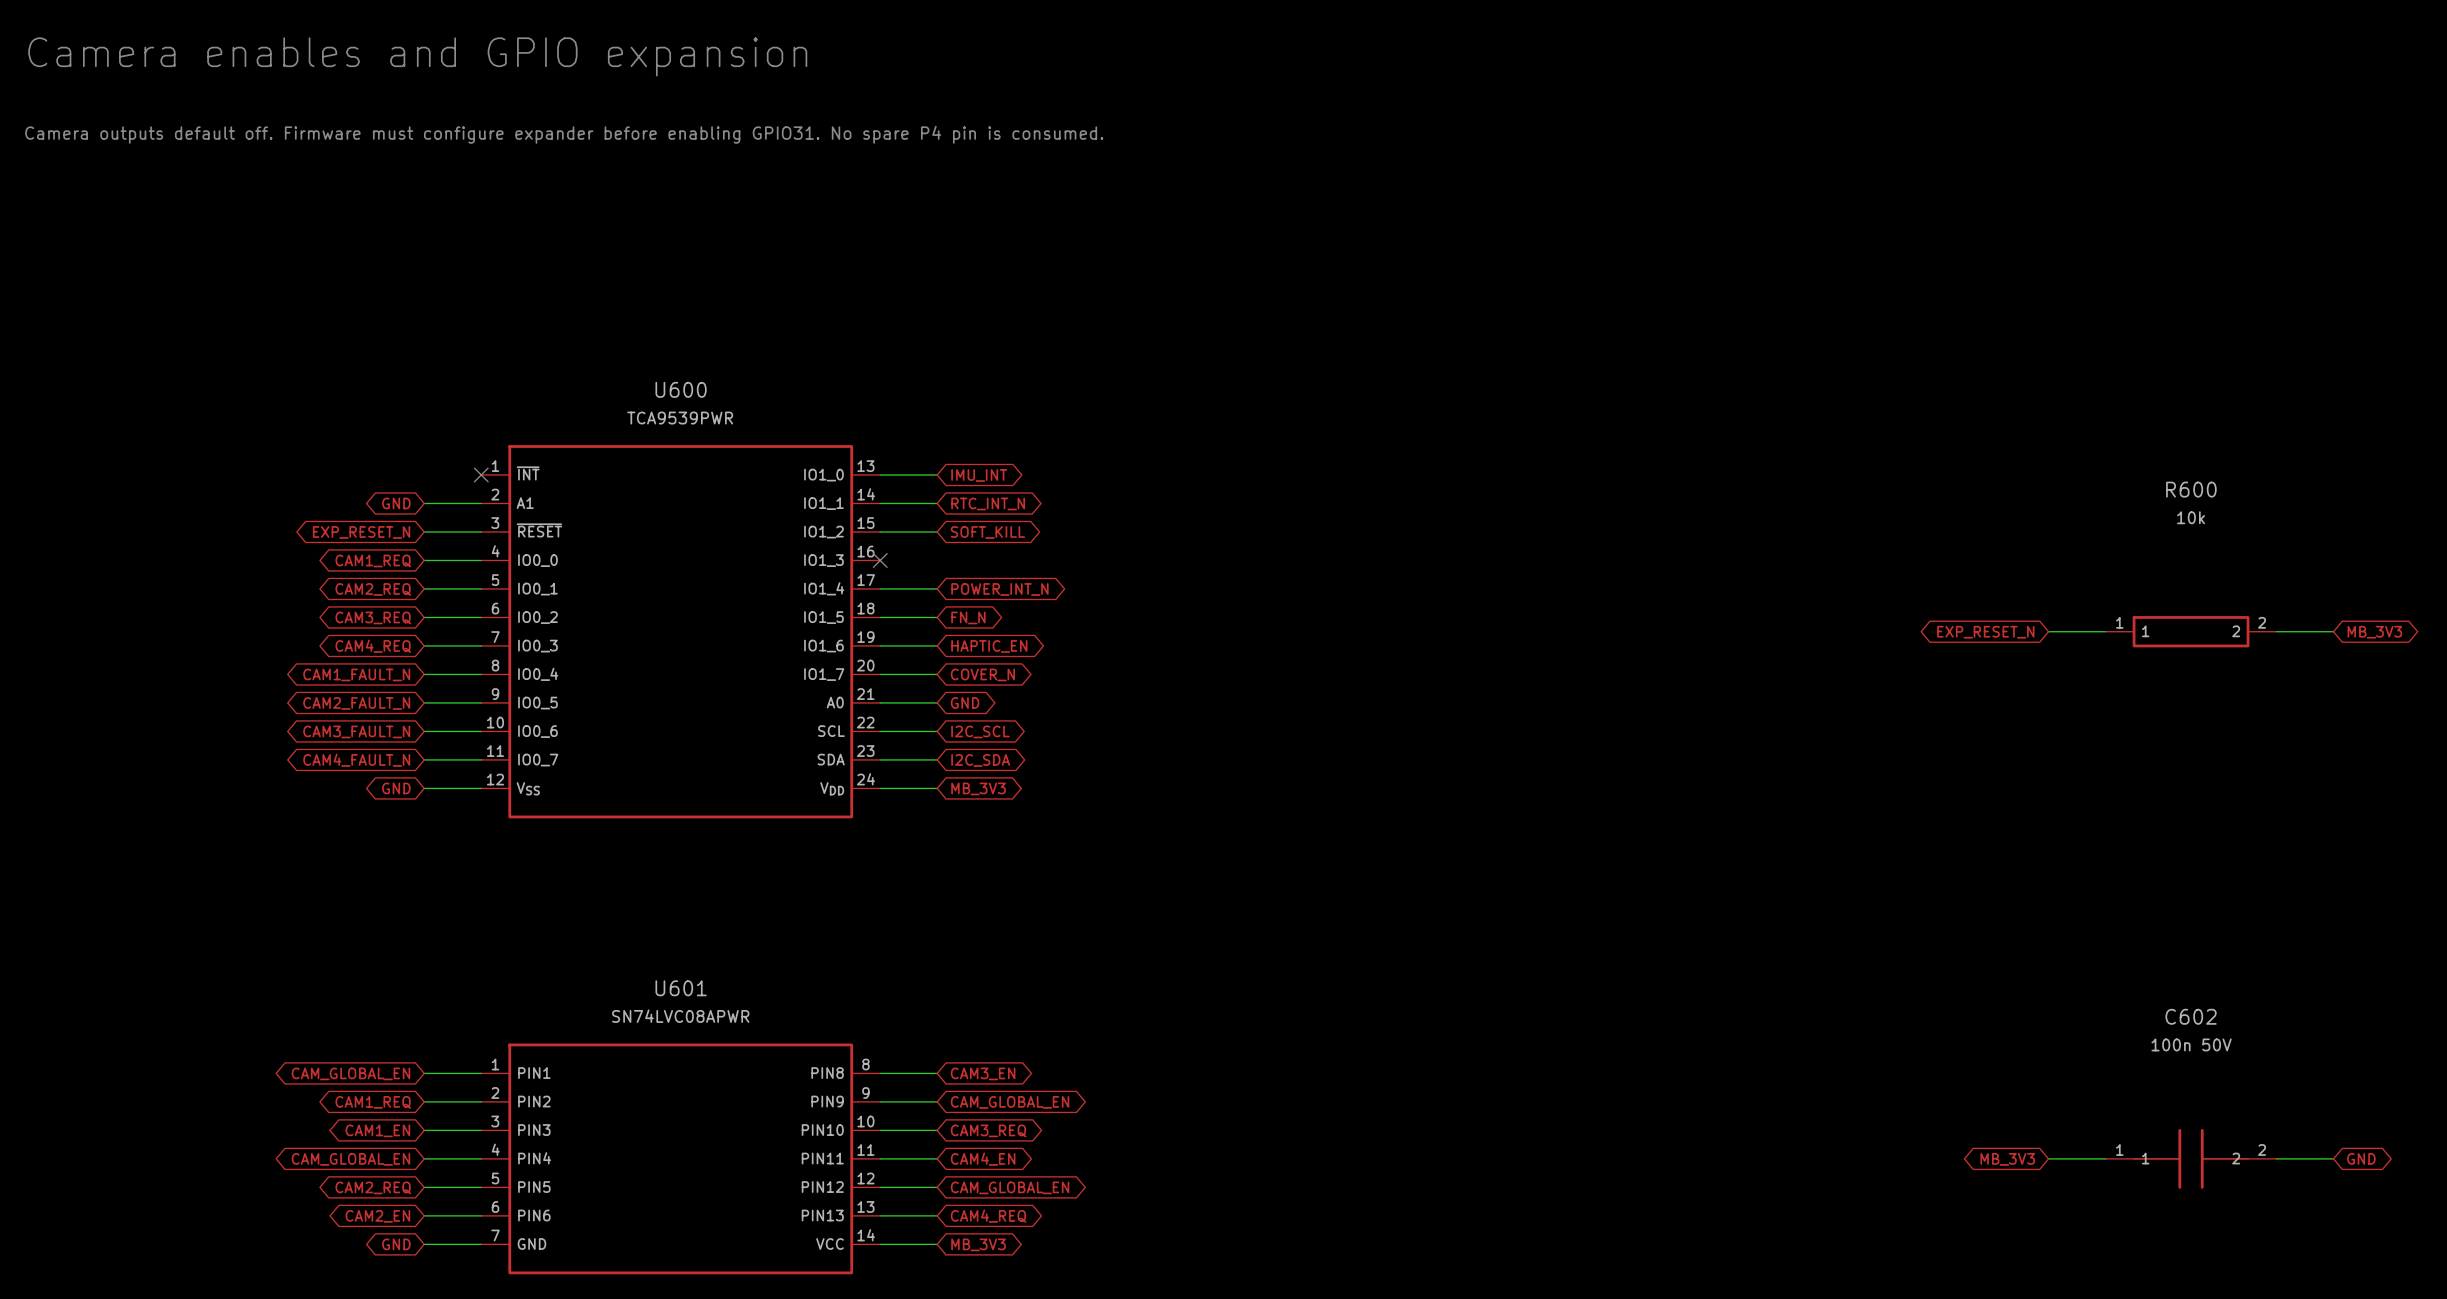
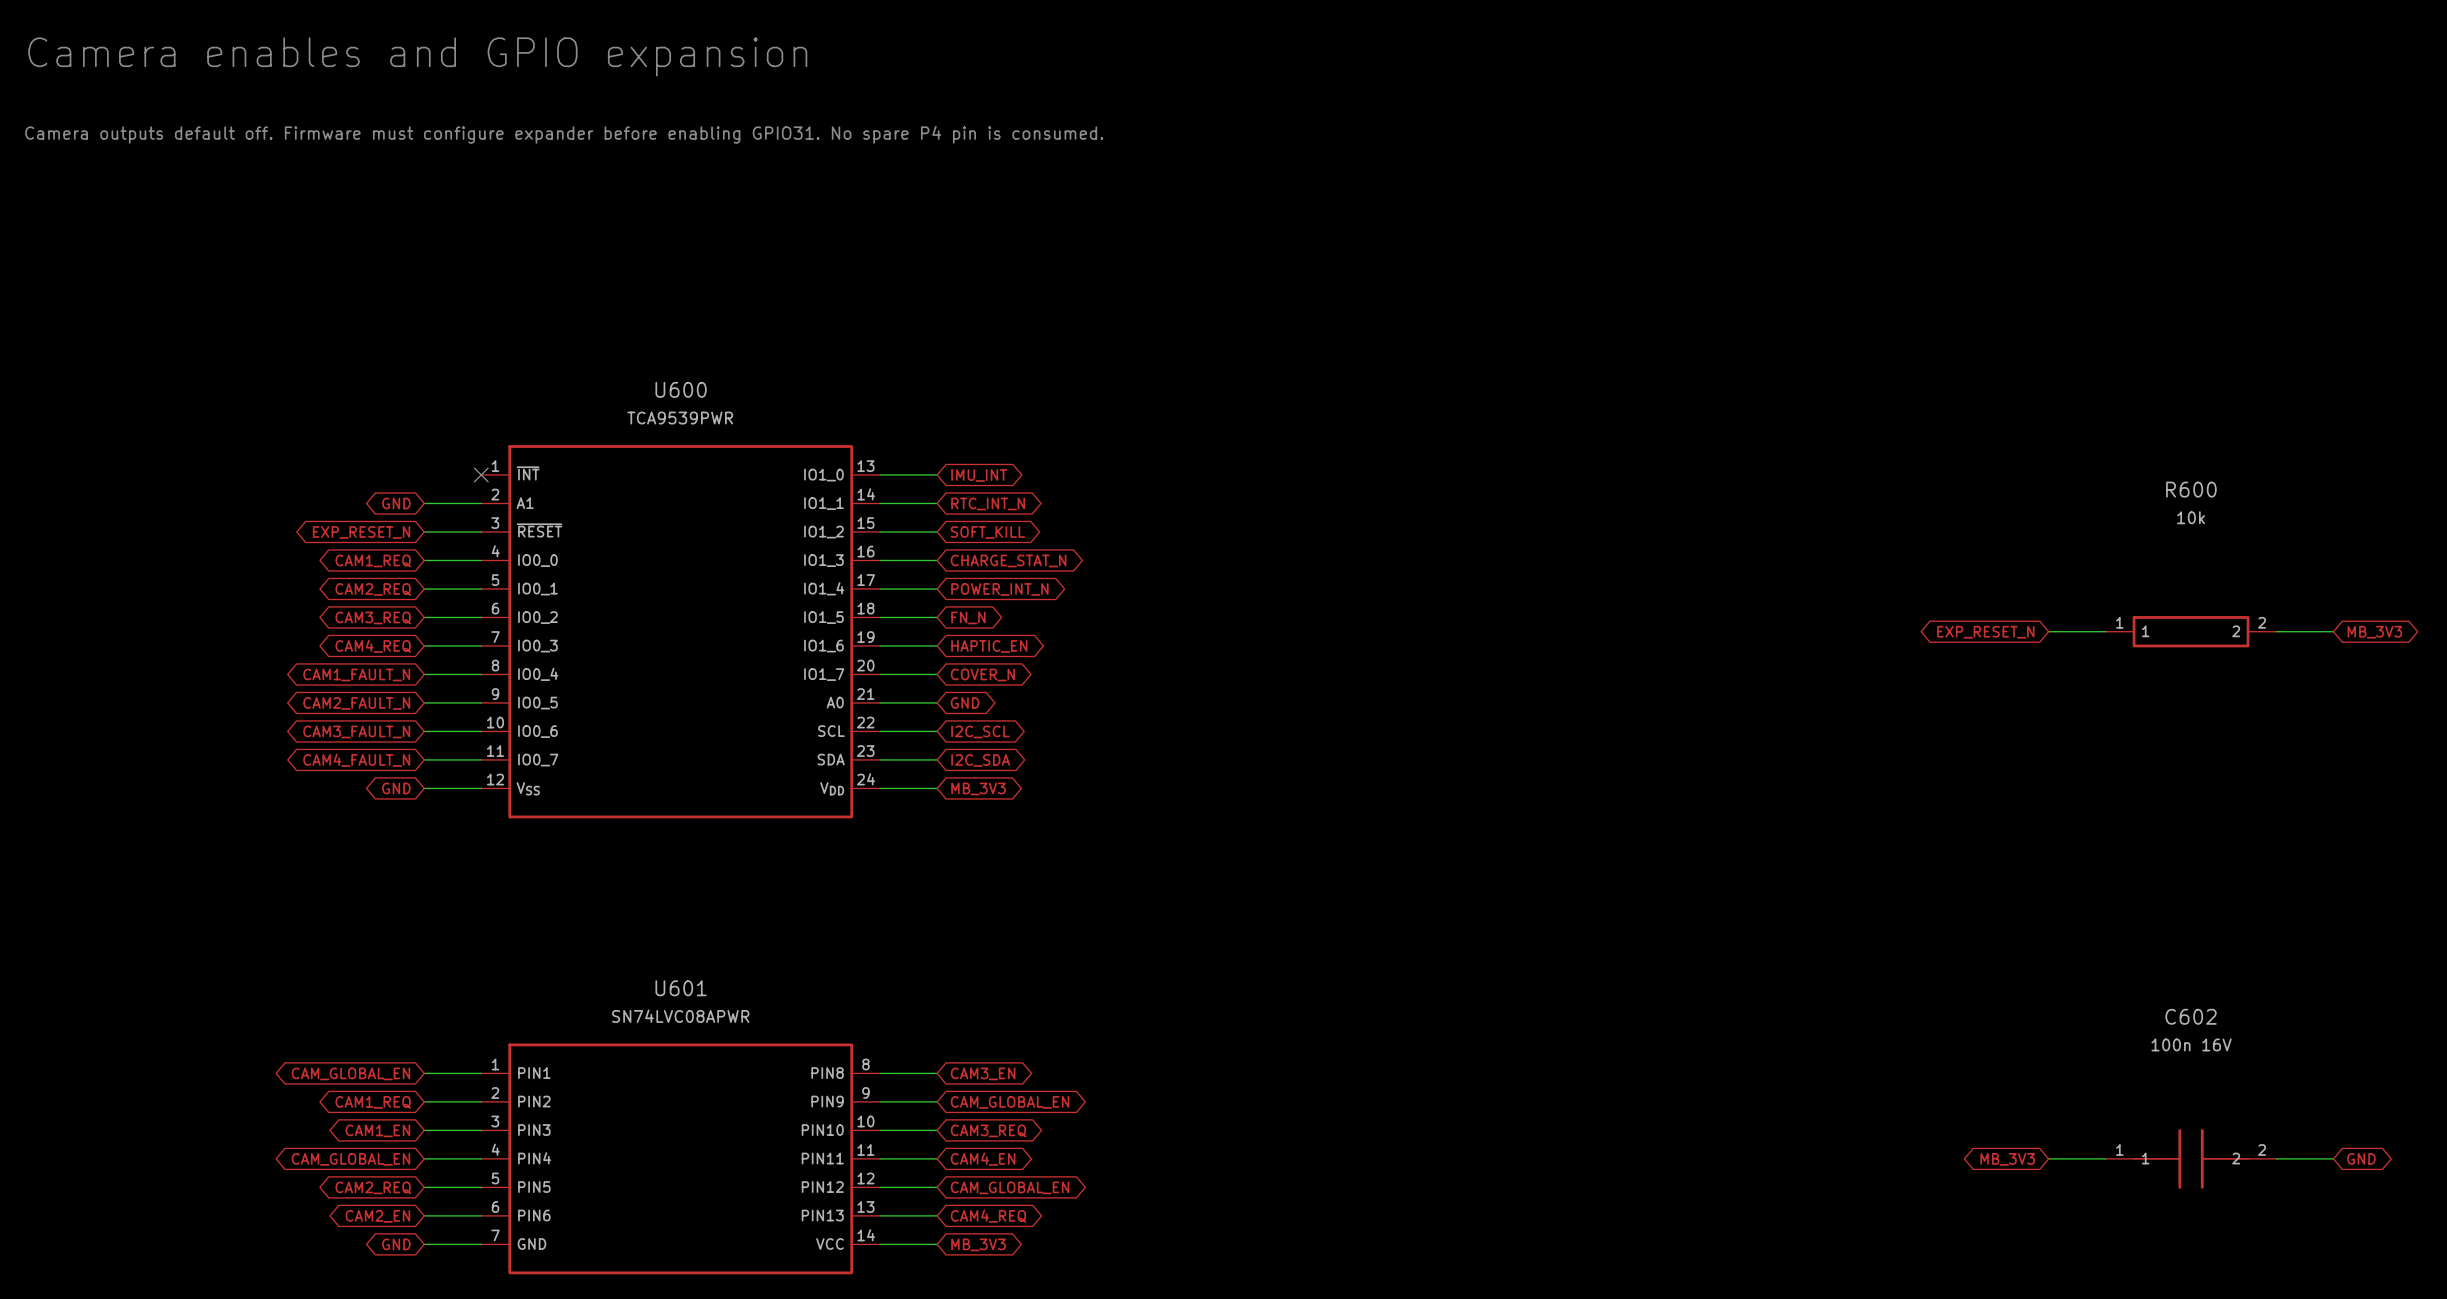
wire: none -> (880, 560) (937, 560)
no-connect mark: (880, 560) -> none
global label: none -> CHARGE_STAT_N (1008, 560)
C602 value: 100n 50V (2191, 1044) -> 100n 16V (2191, 1044)

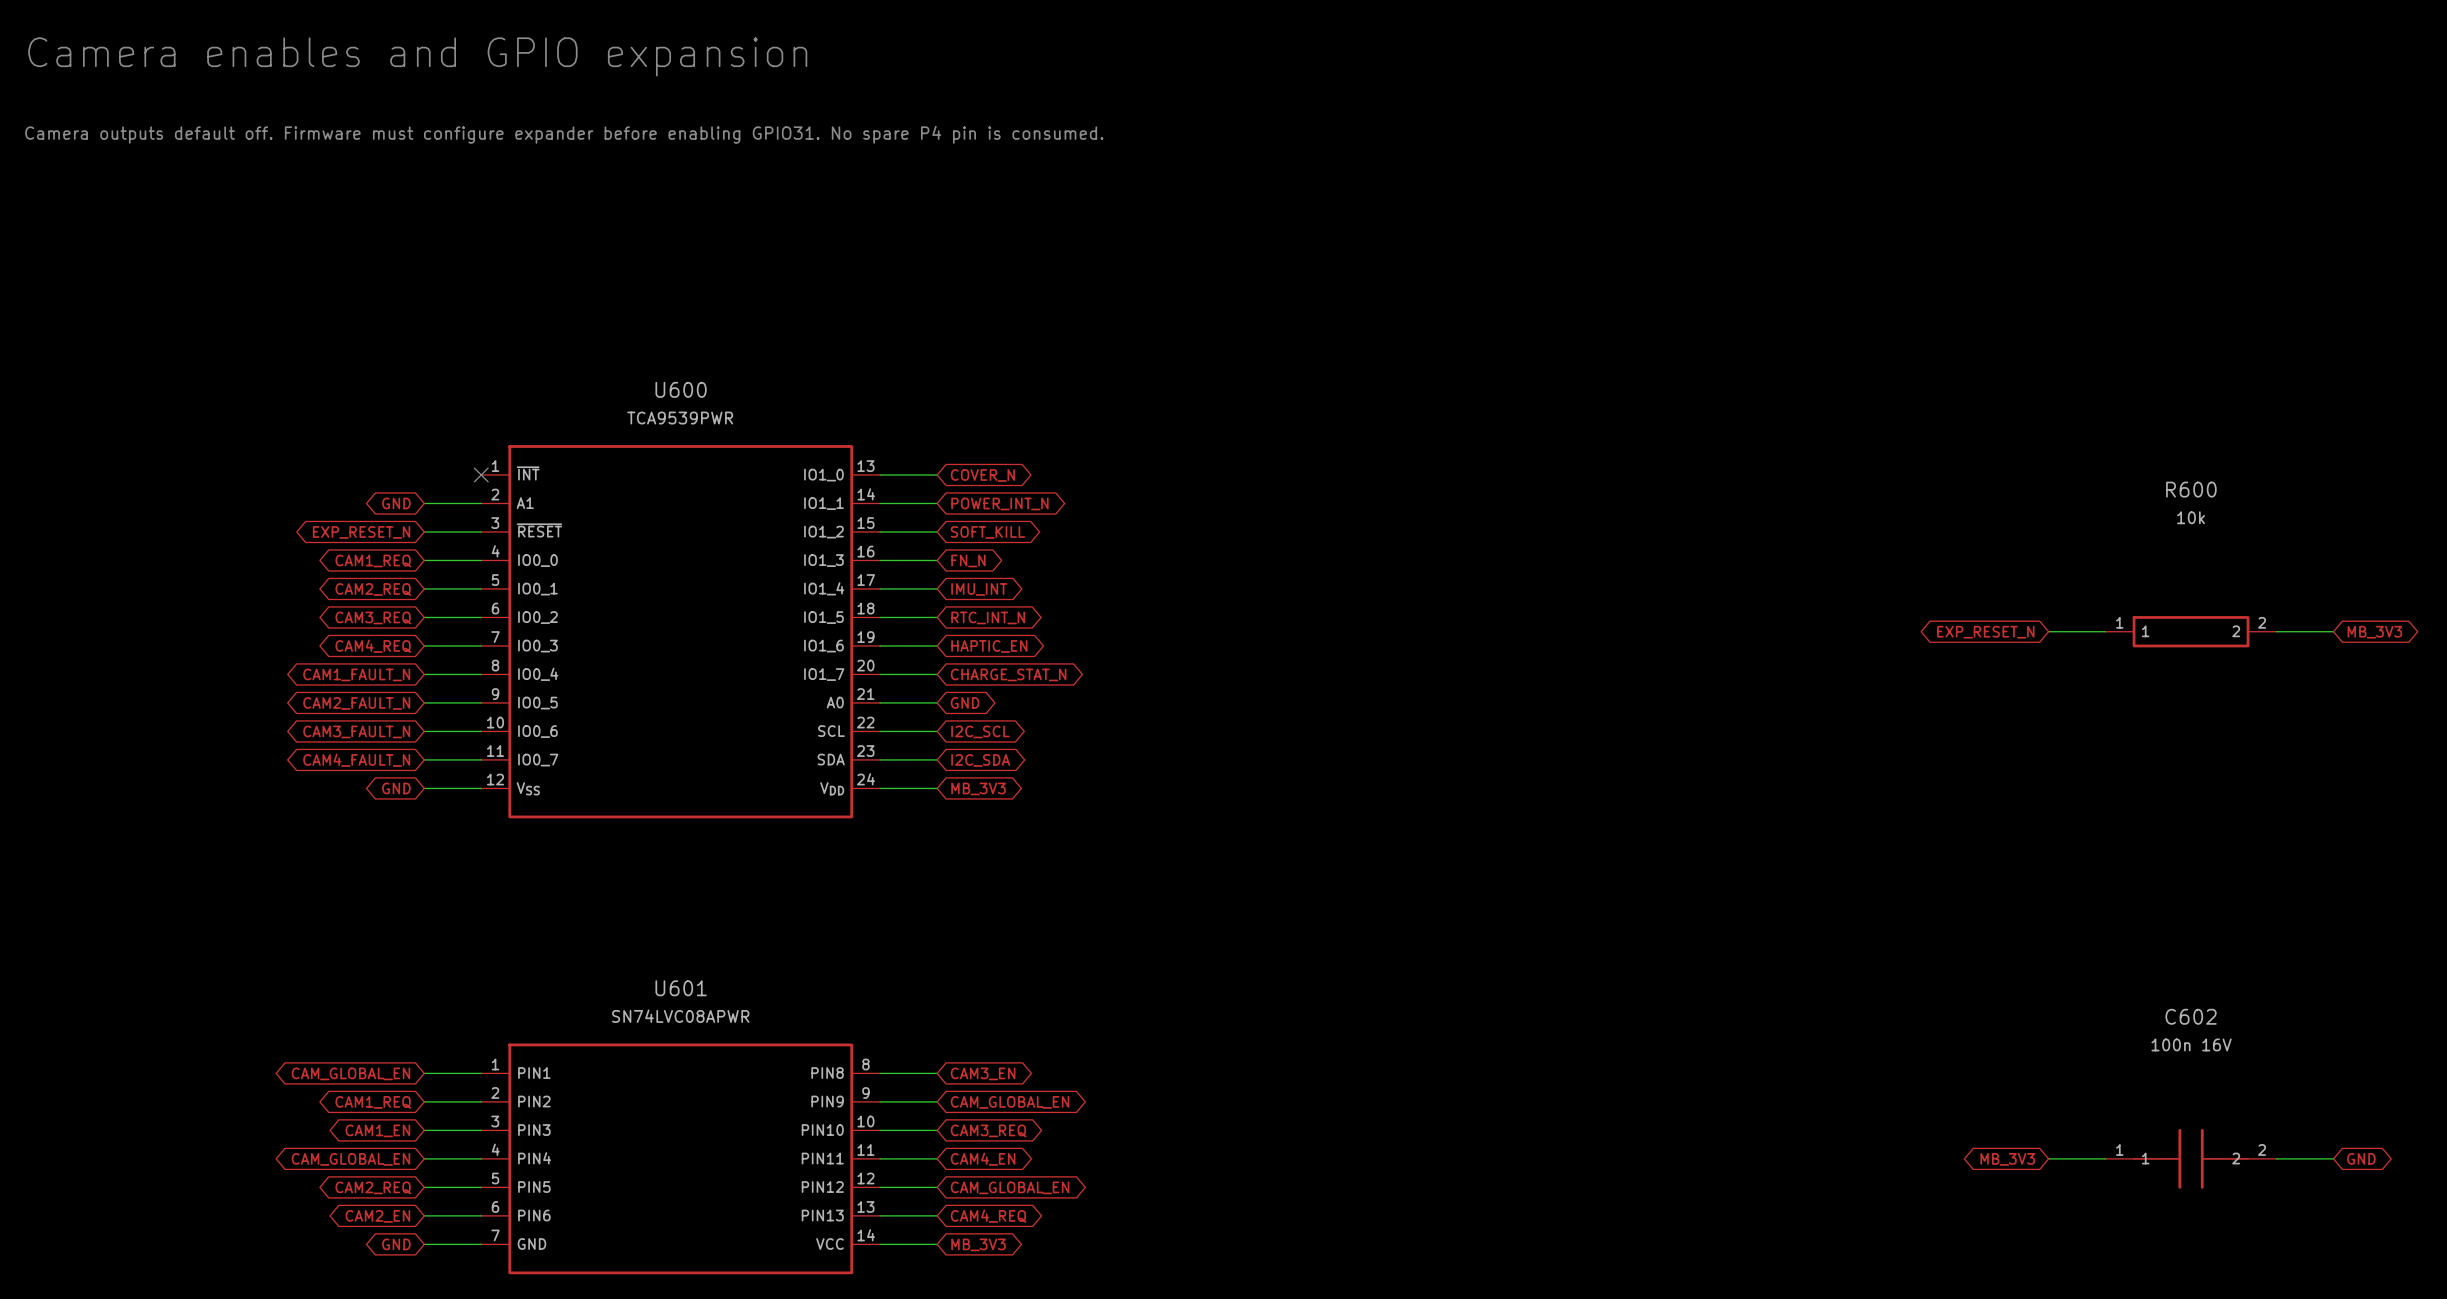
global label: IMU_INT (979, 475) -> COVER_N (982, 475)
global label: RTC_INT_N (988, 503) -> POWER_INT_N (999, 503)
global label: CHARGE_STAT_N (1008, 560) -> FN_N (968, 560)
global label: POWER_INT_N (999, 589) -> IMU_INT (979, 589)
global label: FN_N (968, 617) -> RTC_INT_N (988, 617)
global label: COVER_N (982, 674) -> CHARGE_STAT_N (1008, 674)

